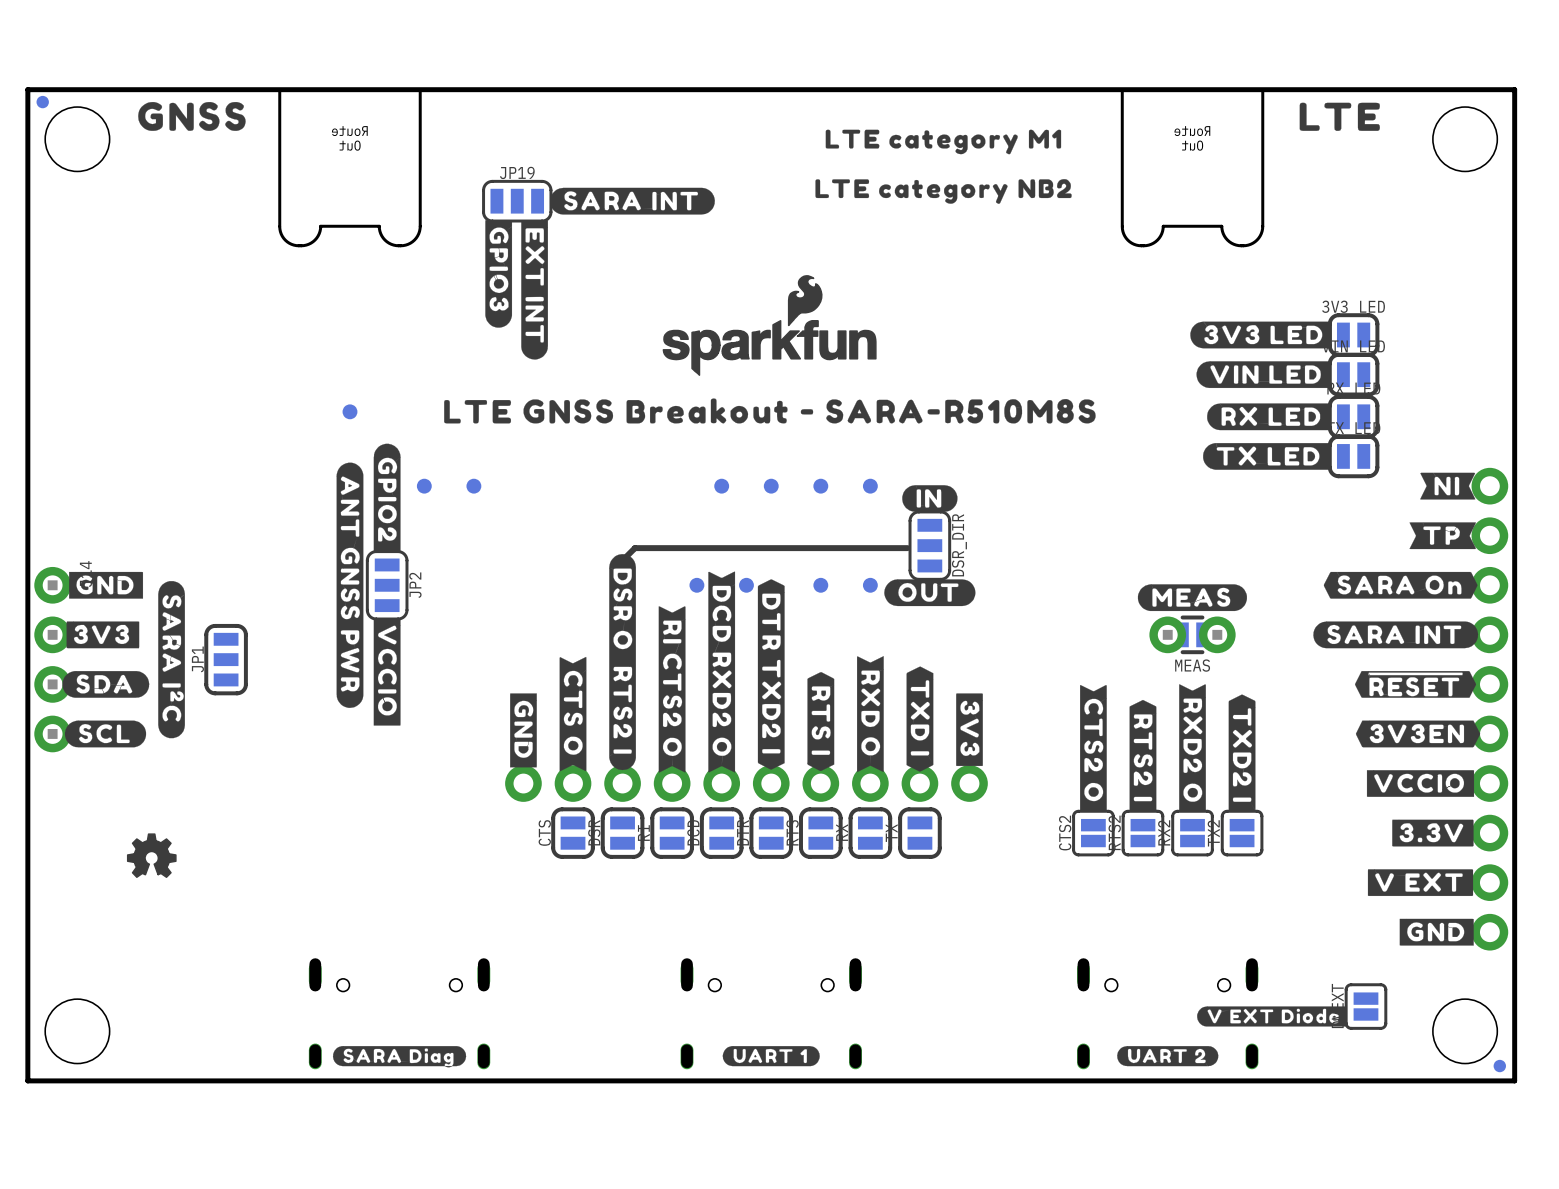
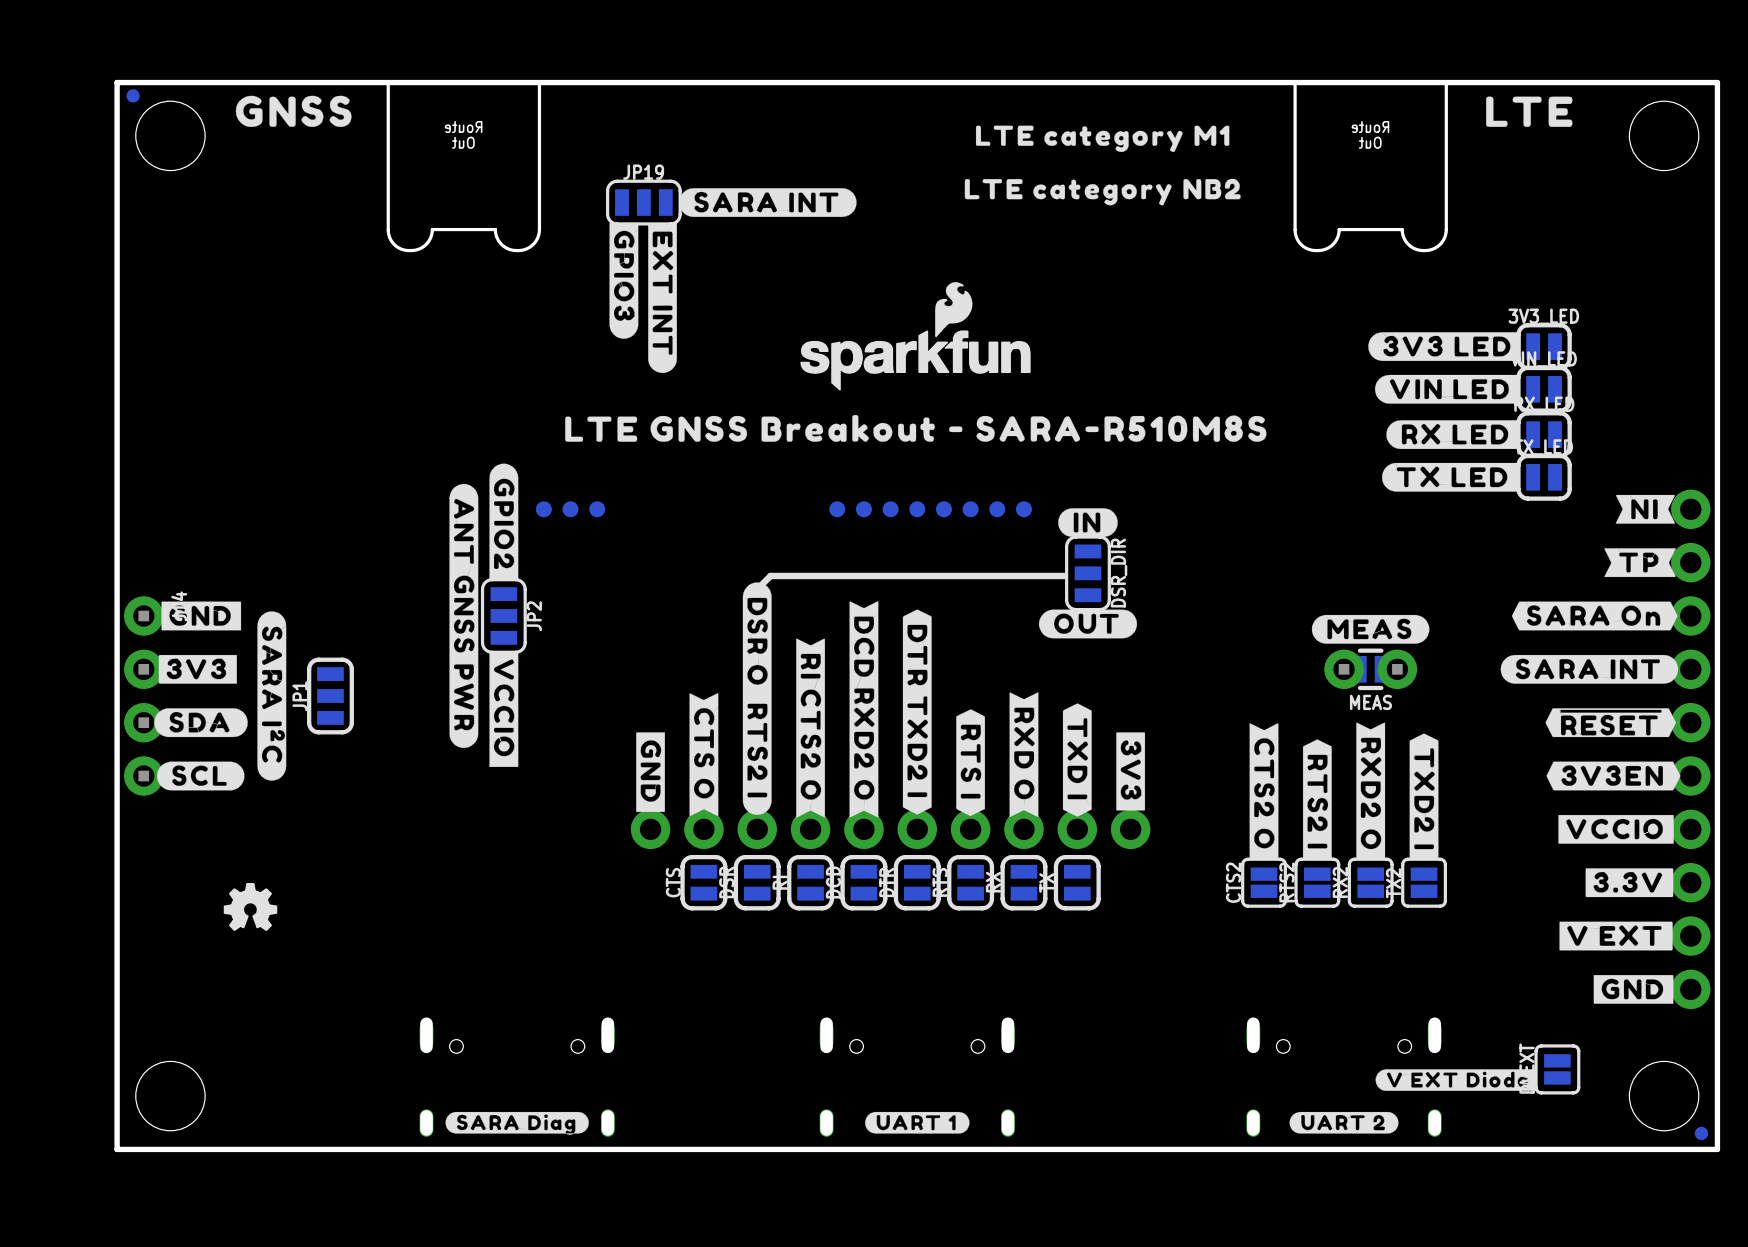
part position: (349, 411) -> (570, 509)
part: none -> (837, 509)
part: none -> (890, 509)
part: none -> (943, 509)
part: none -> (997, 509)
part: (696, 585) -> none
part: (746, 585) -> none
part: (820, 585) -> none
part: (870, 585) -> none

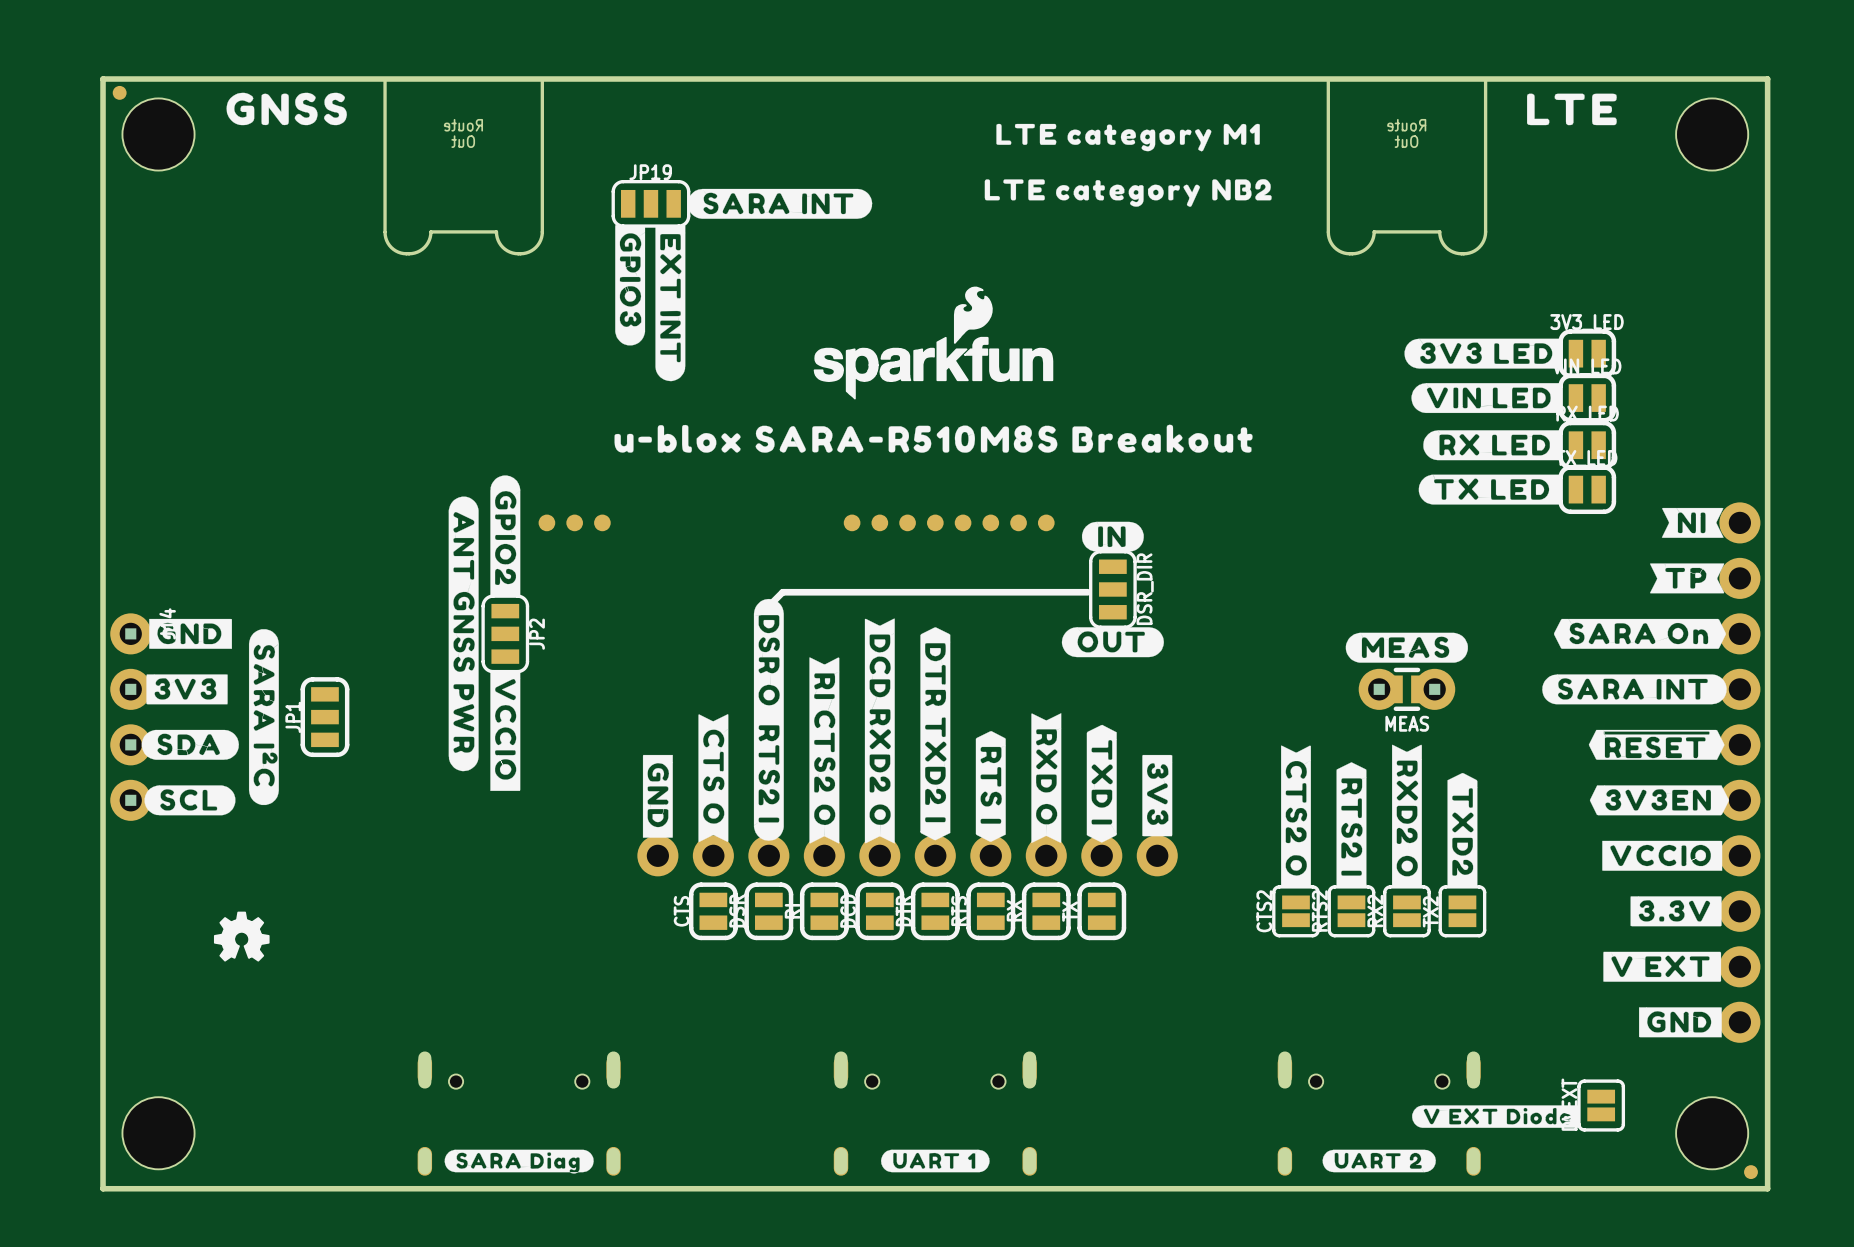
drawing shape: [565, 414, 1267, 442] -> [614, 424, 1253, 453]
drawing shape: [1409, 733, 1439, 860] -> [1447, 773, 1478, 888]

